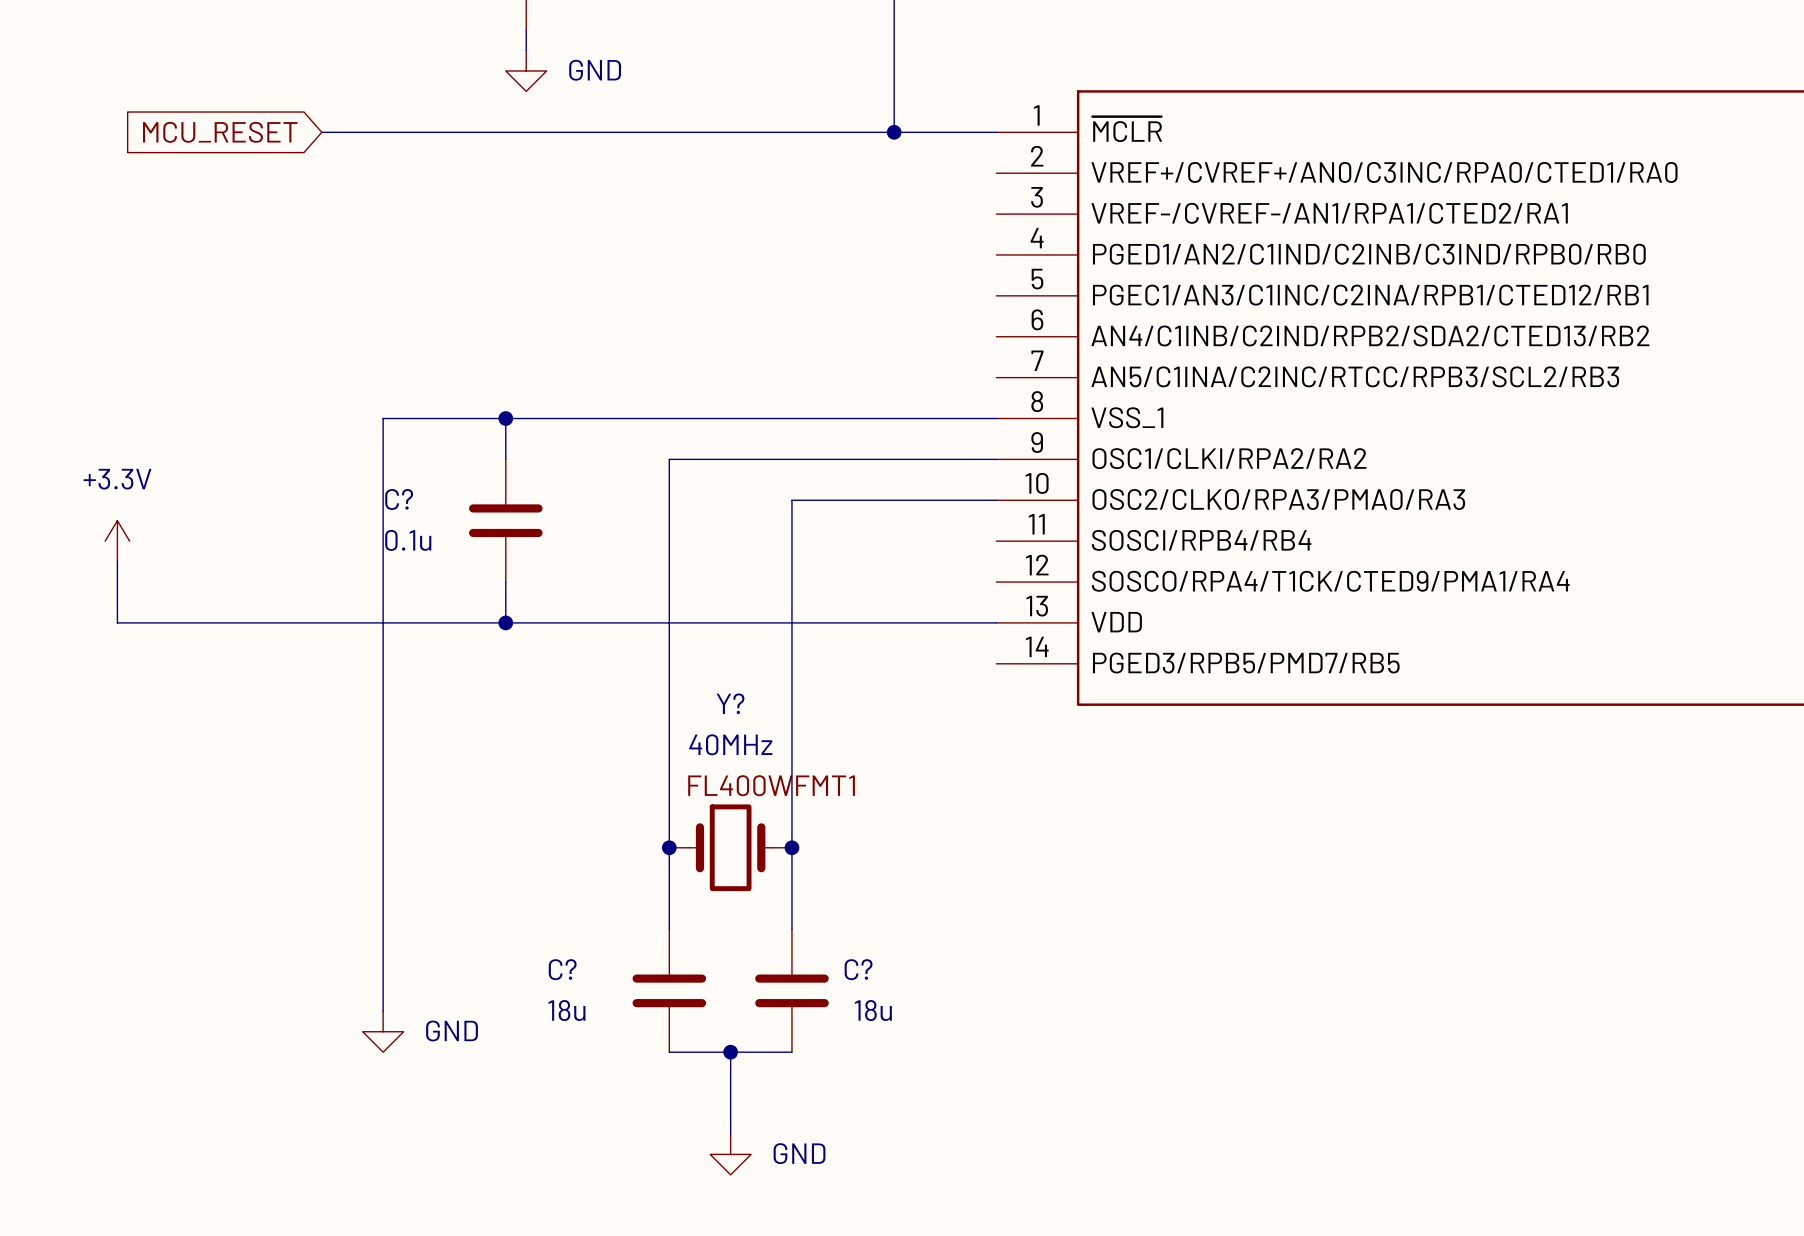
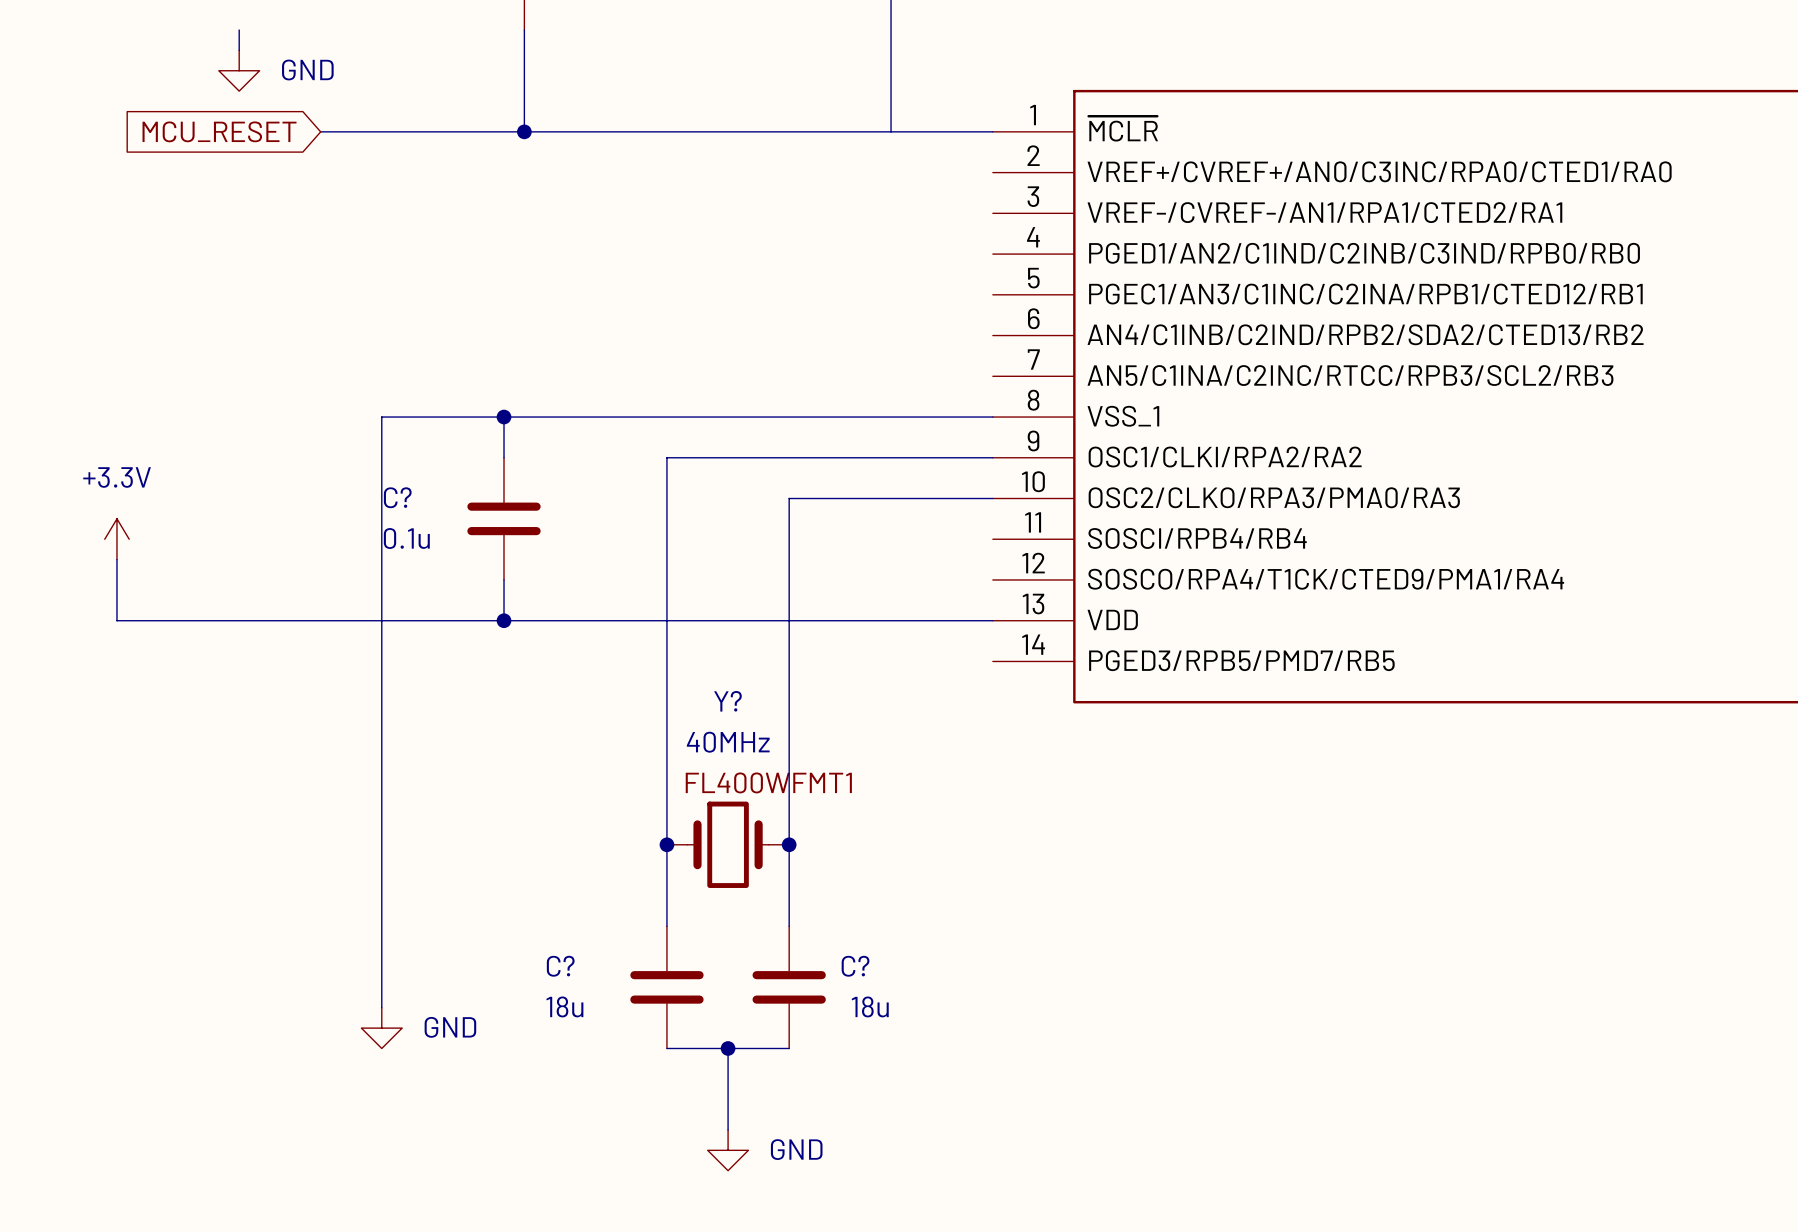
wire: none -> (239, 30) (239, 50)
wire: none -> (524, 50) (524, 131)
power symbol position: GND (526, 71) -> GND (239, 70)
junction: none -> (524, 131)
junction: (894, 132) -> none

